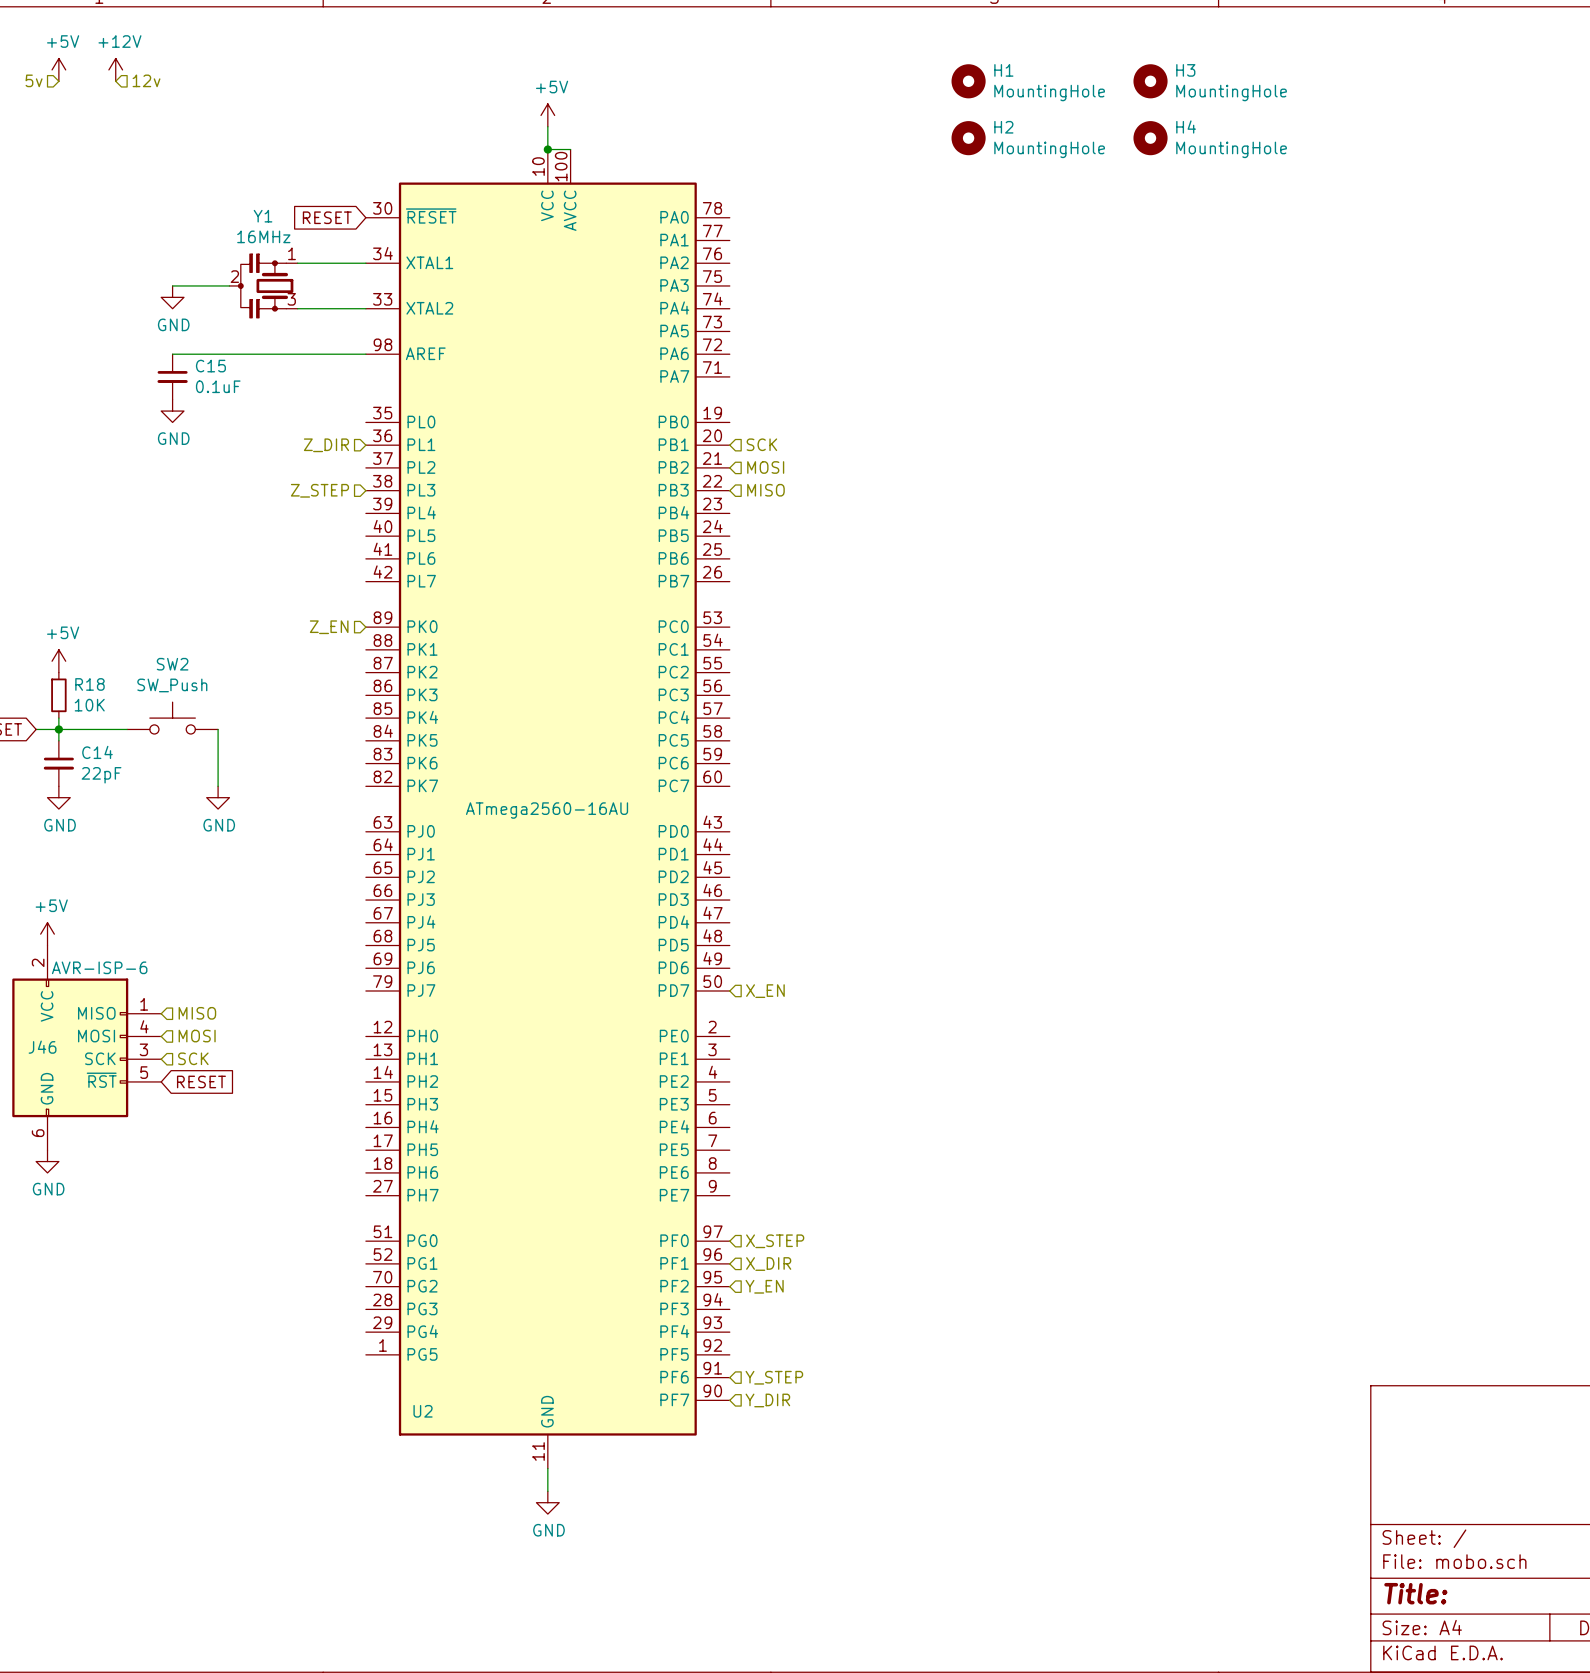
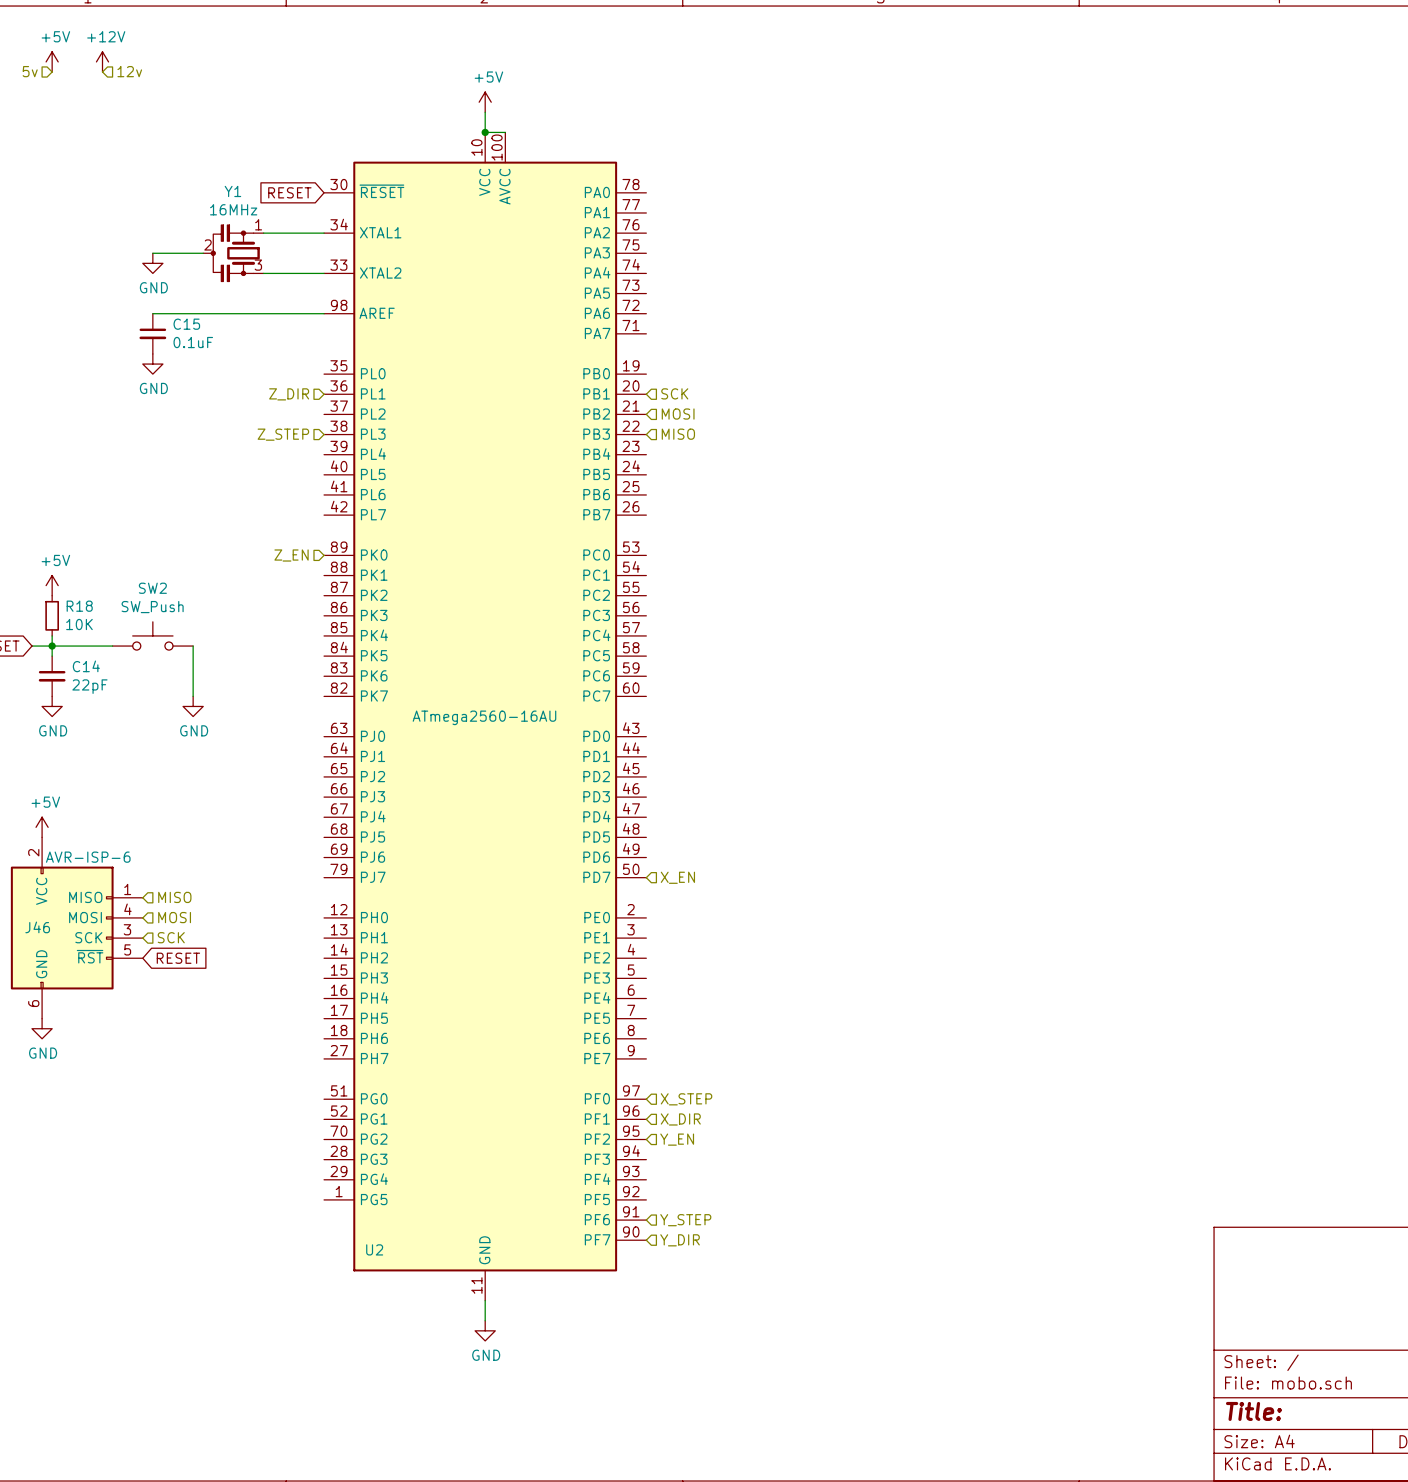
H1: MountingHole (968, 81) -> none
H3: MountingHole (1150, 81) -> none
H2: MountingHole (968, 138) -> none
H4: MountingHole (1150, 138) -> none

